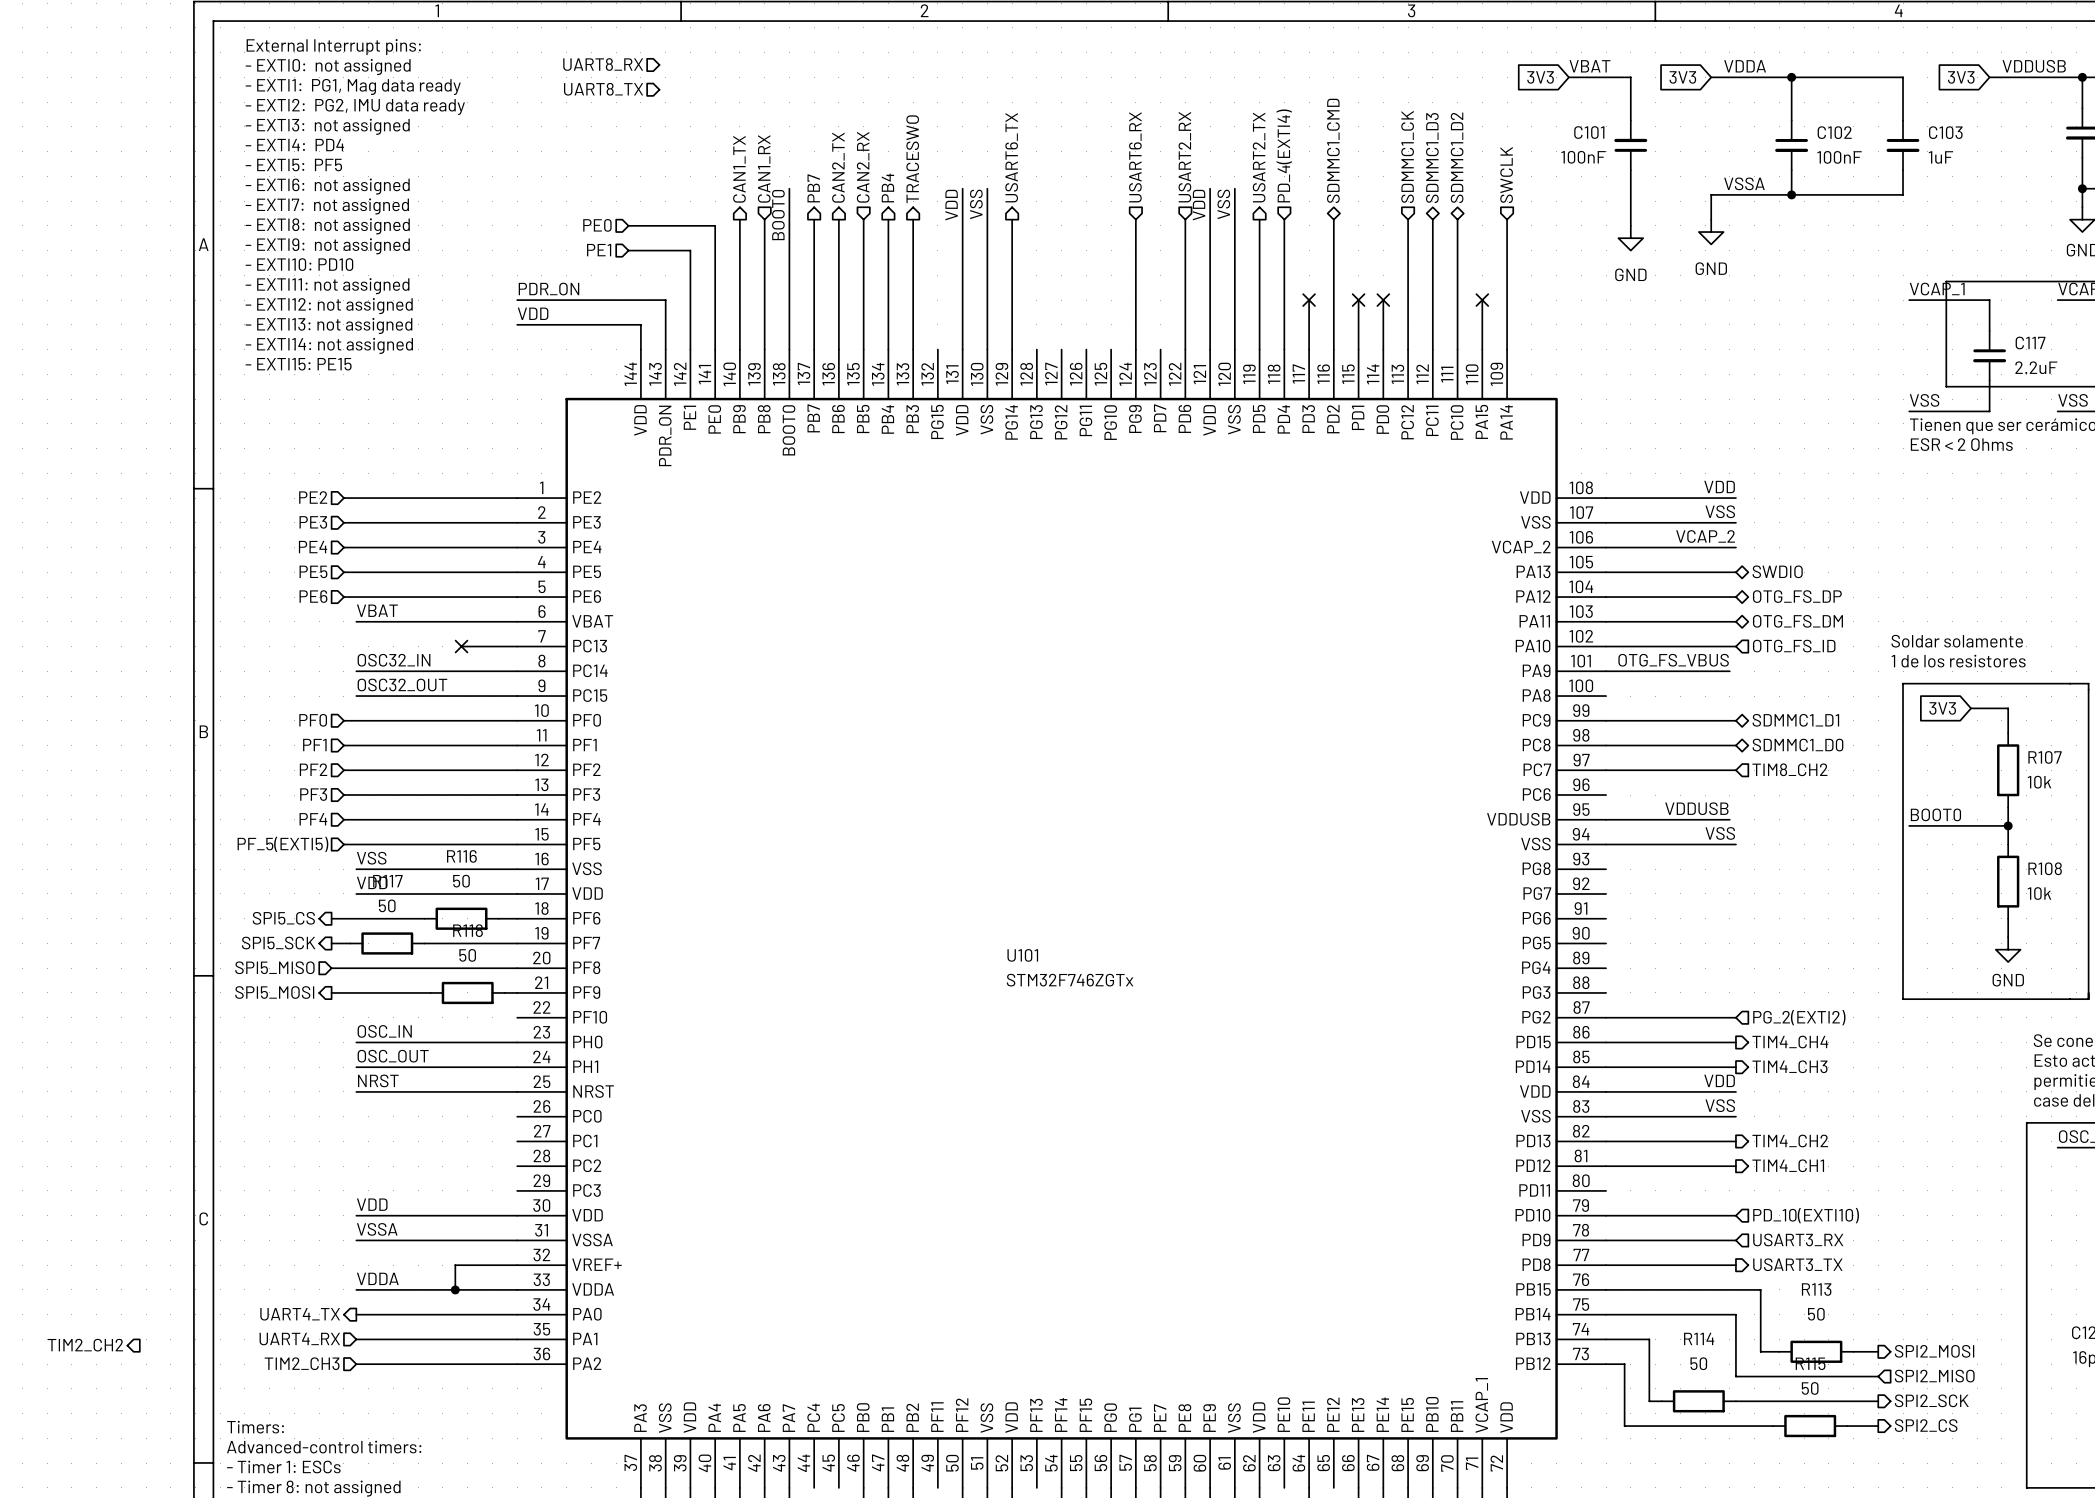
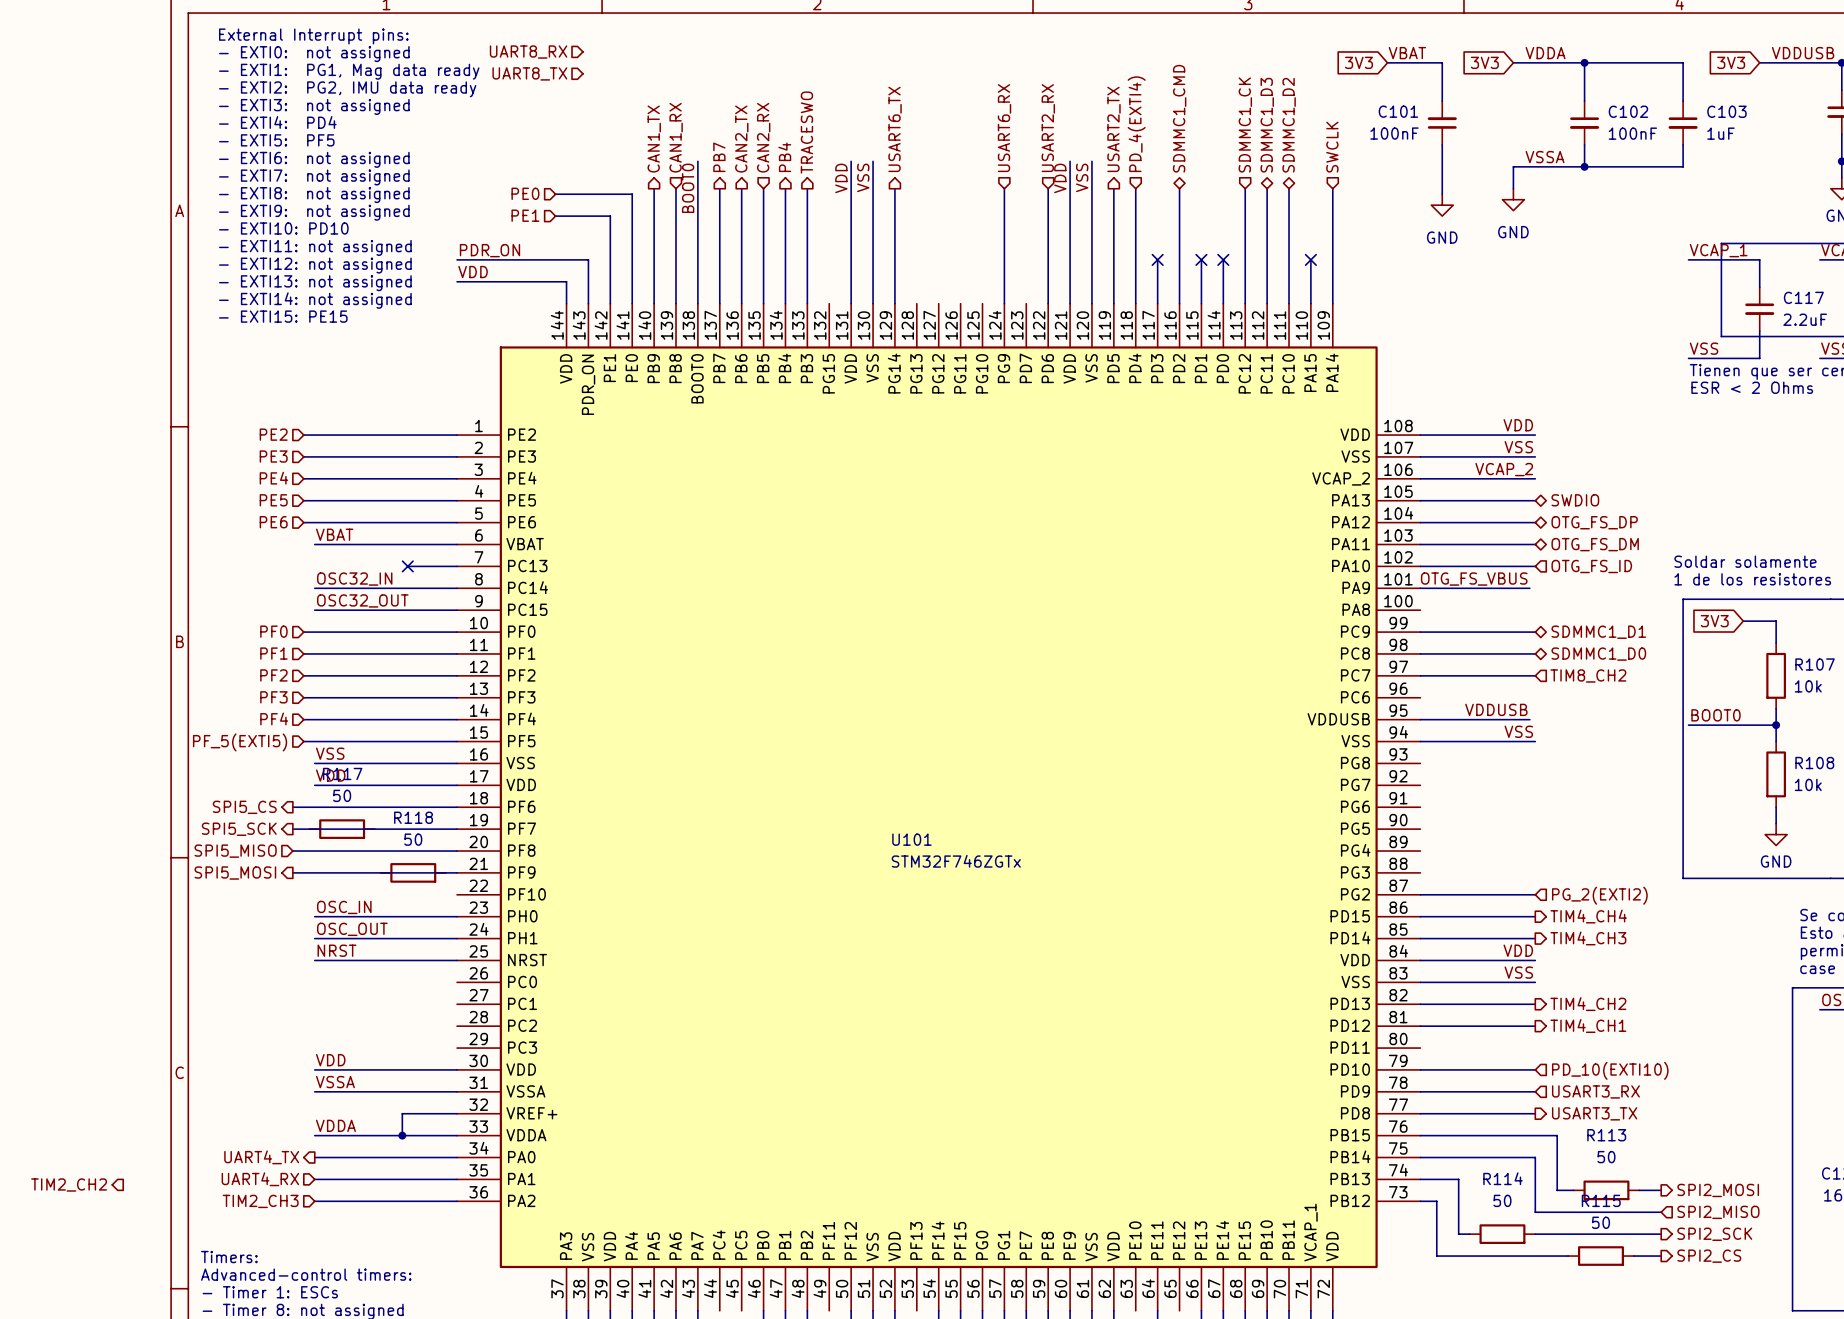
wire: none -> (374, 807) (440, 807)
R116: 50 (461, 918) -> none
wire: none -> (309, 829) (374, 829)
wire: none -> (380, 872) (446, 872)

